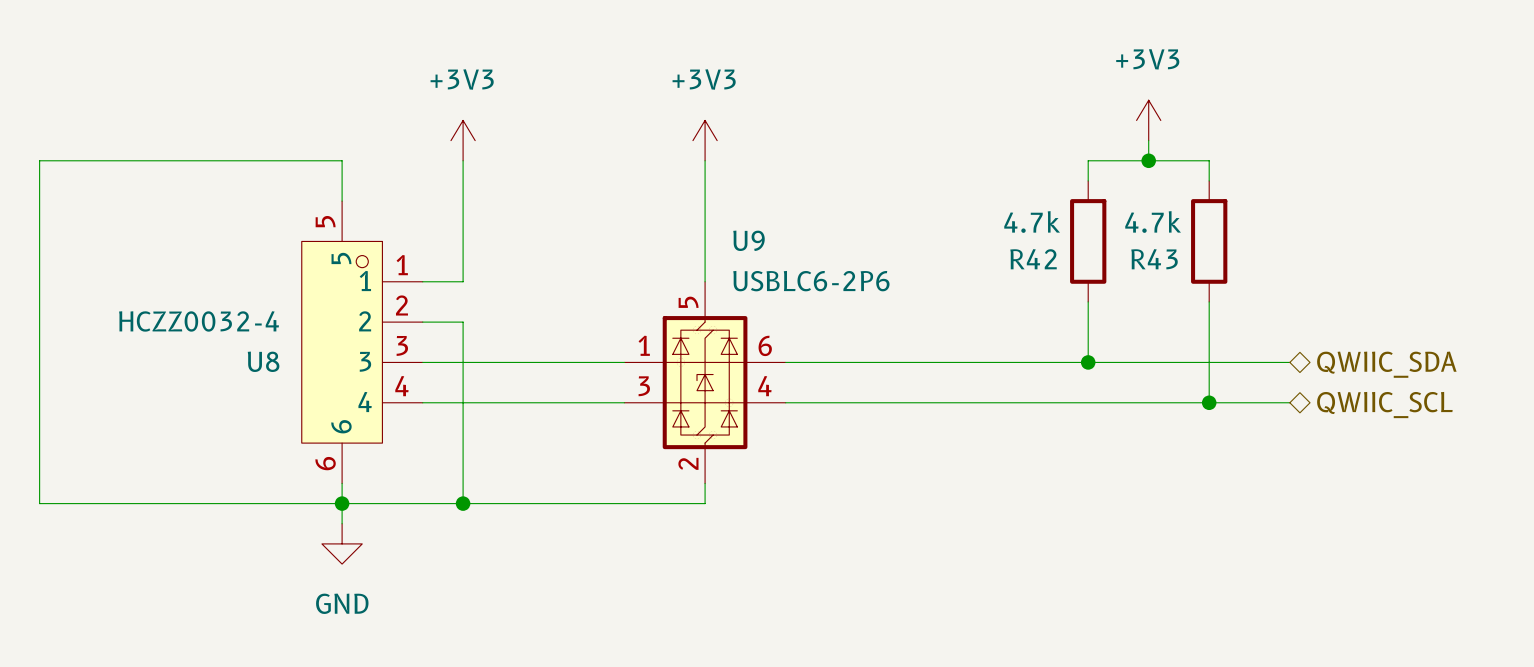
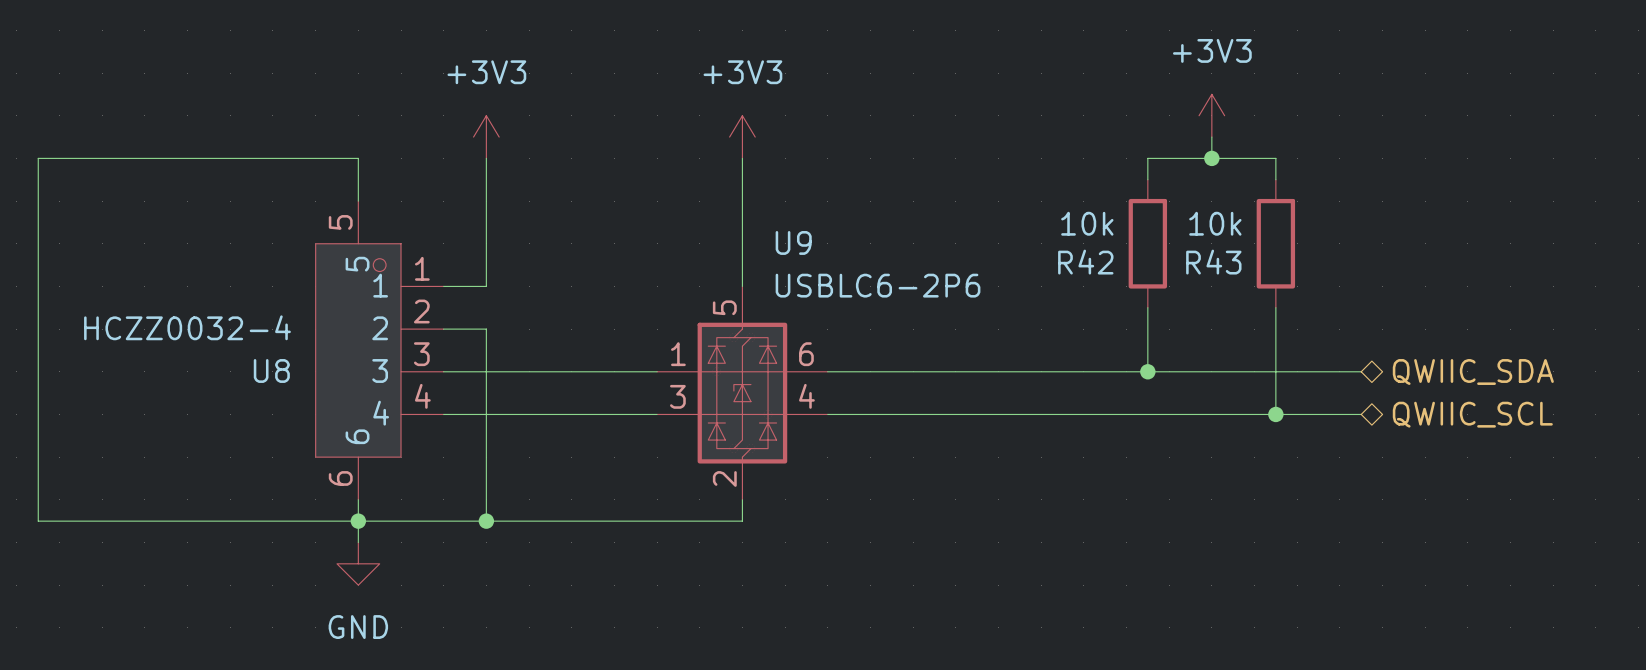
R42 value: 4.7k (1032, 221) -> 10k (1087, 223)
R43 value: 4.7k (1153, 221) -> 10k (1215, 223)

